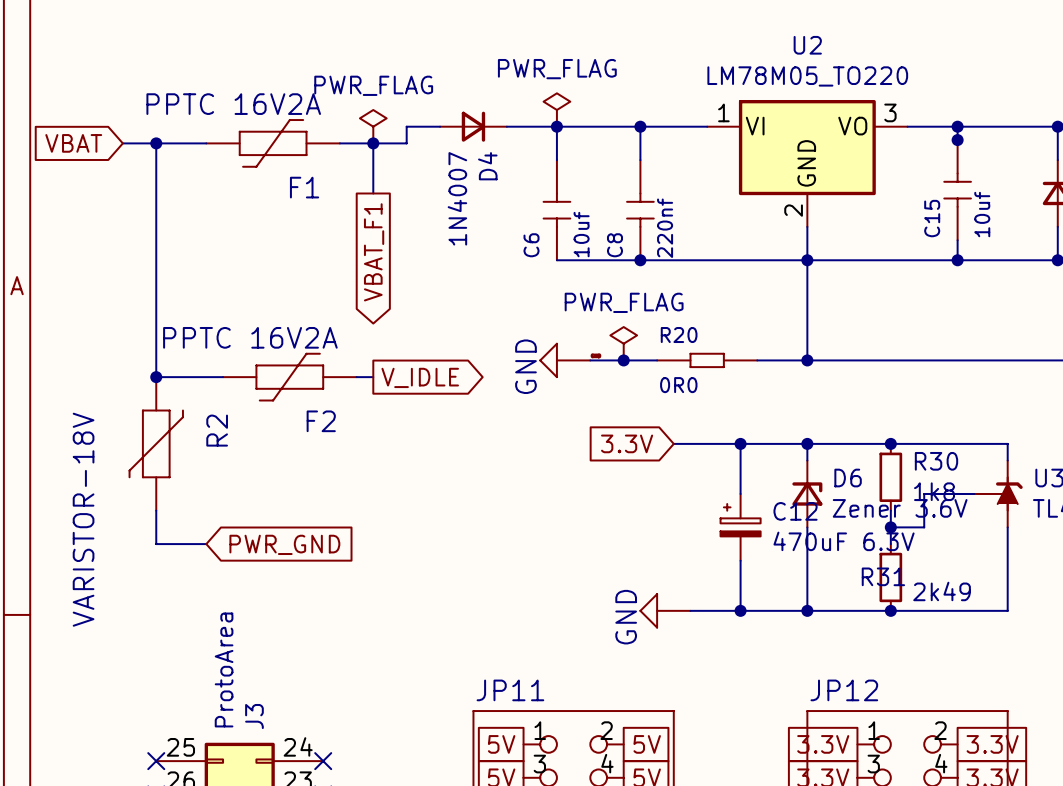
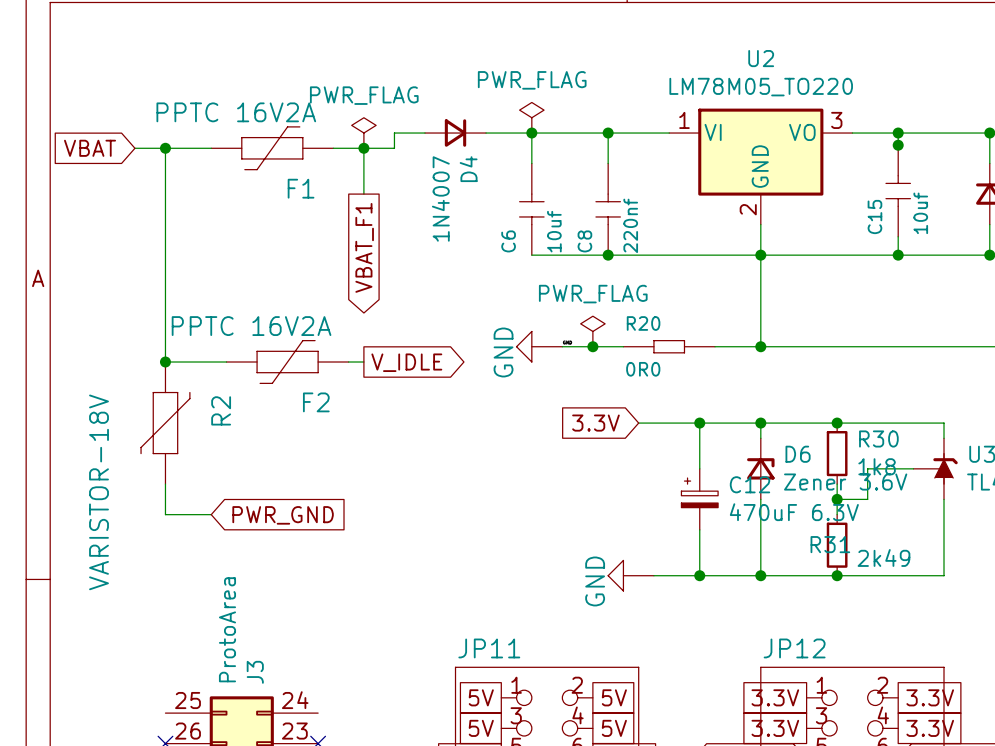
no-connect mark: (156, 761) -> none
no-connect mark: (323, 761) -> none

